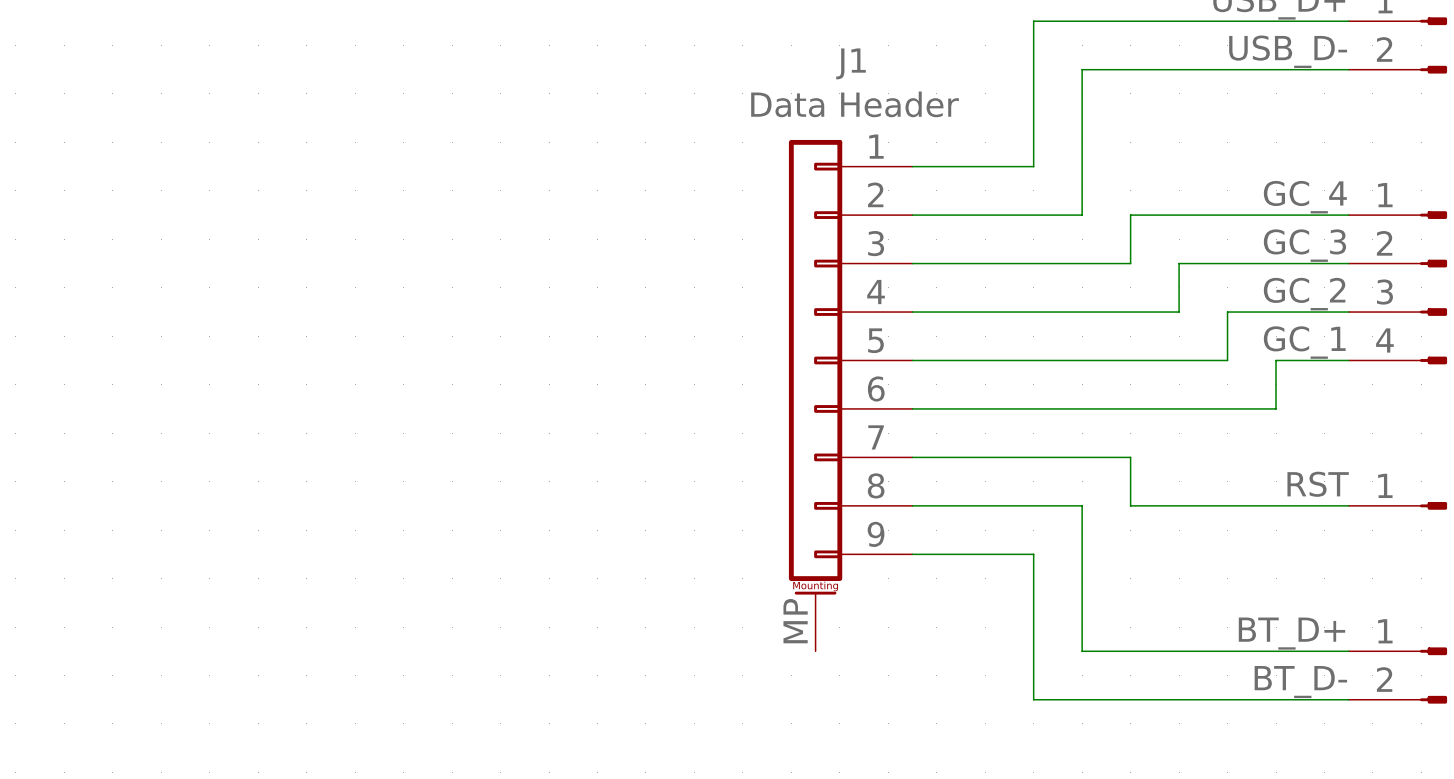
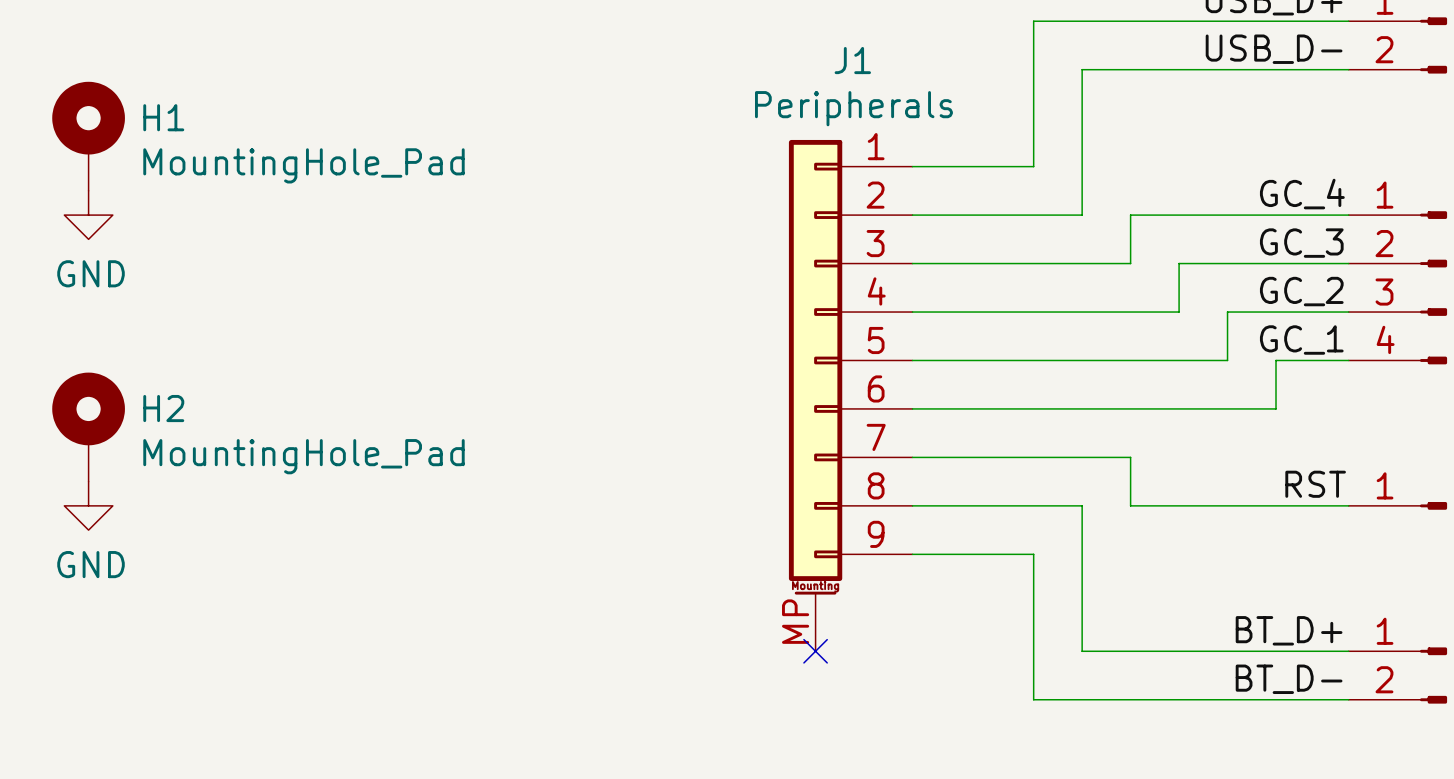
J1 value: Data Header (855, 104) -> Peripherals (853, 108)
H1: none -> MountingHole_Pad (88, 136)
power symbol: none -> GND (88, 215)
H2: none -> MountingHole_Pad (88, 427)
power symbol: none -> GND (88, 505)
no-connect mark: none -> (815, 651)

